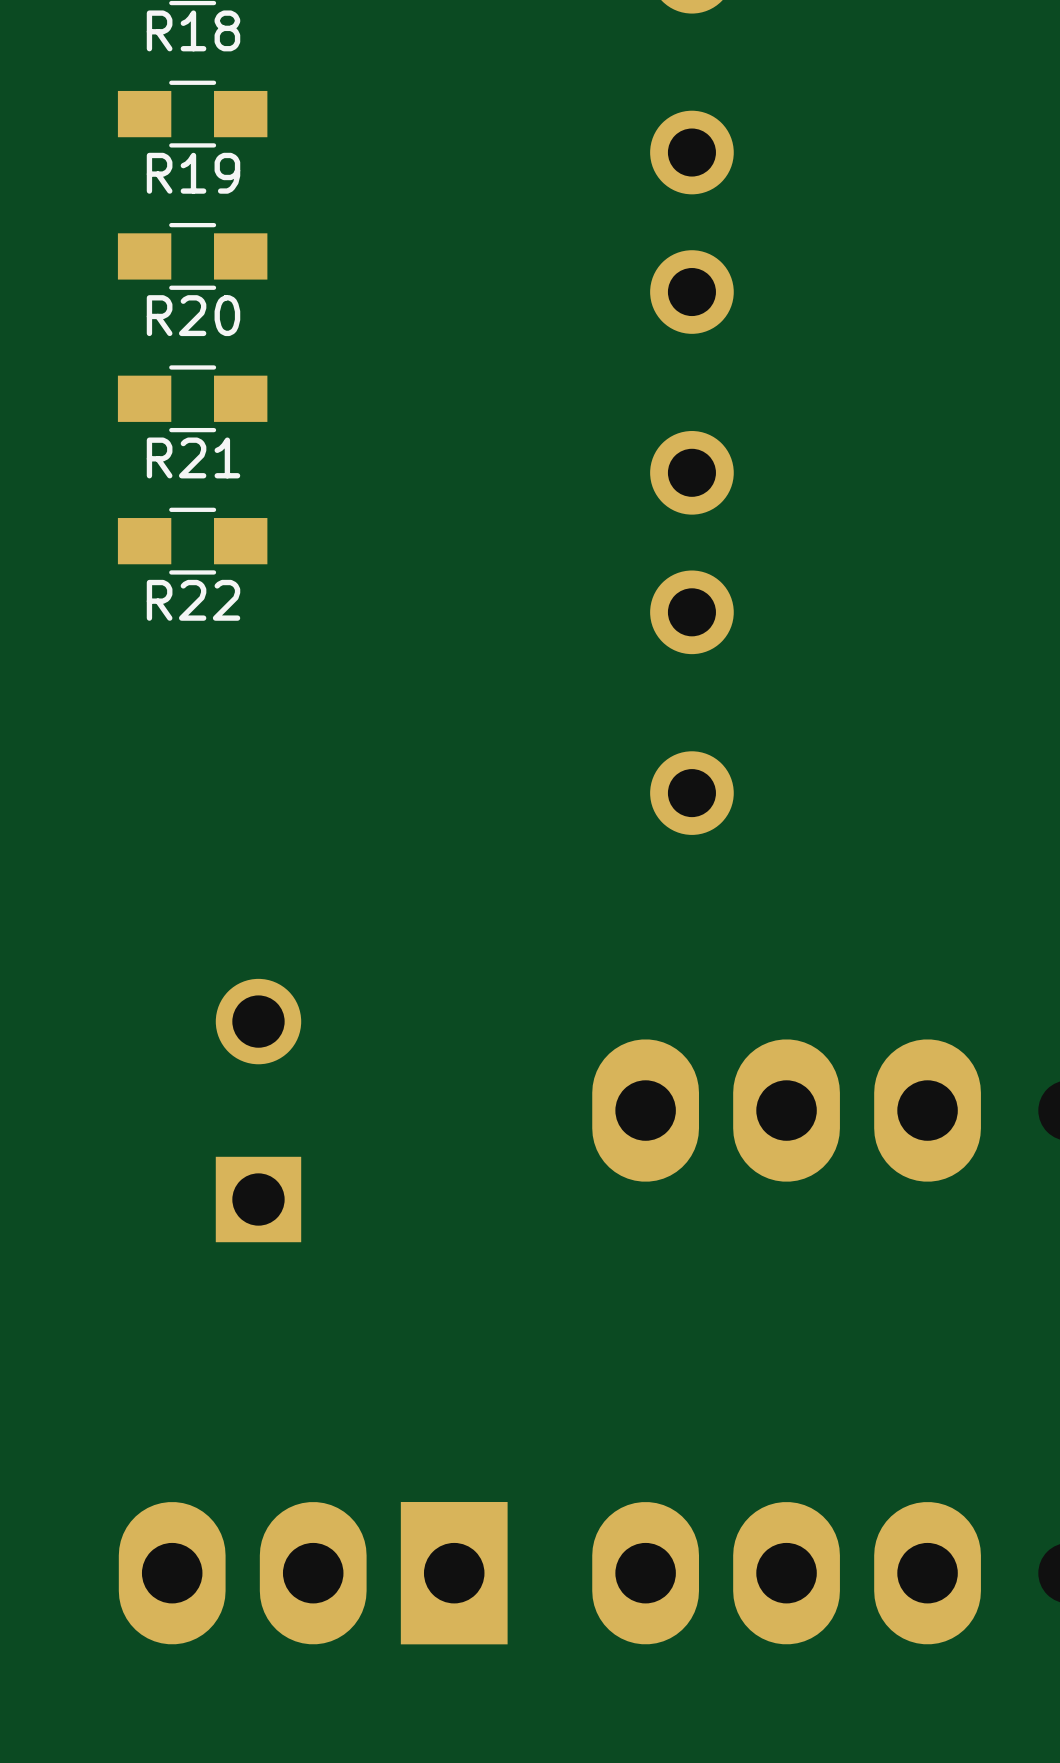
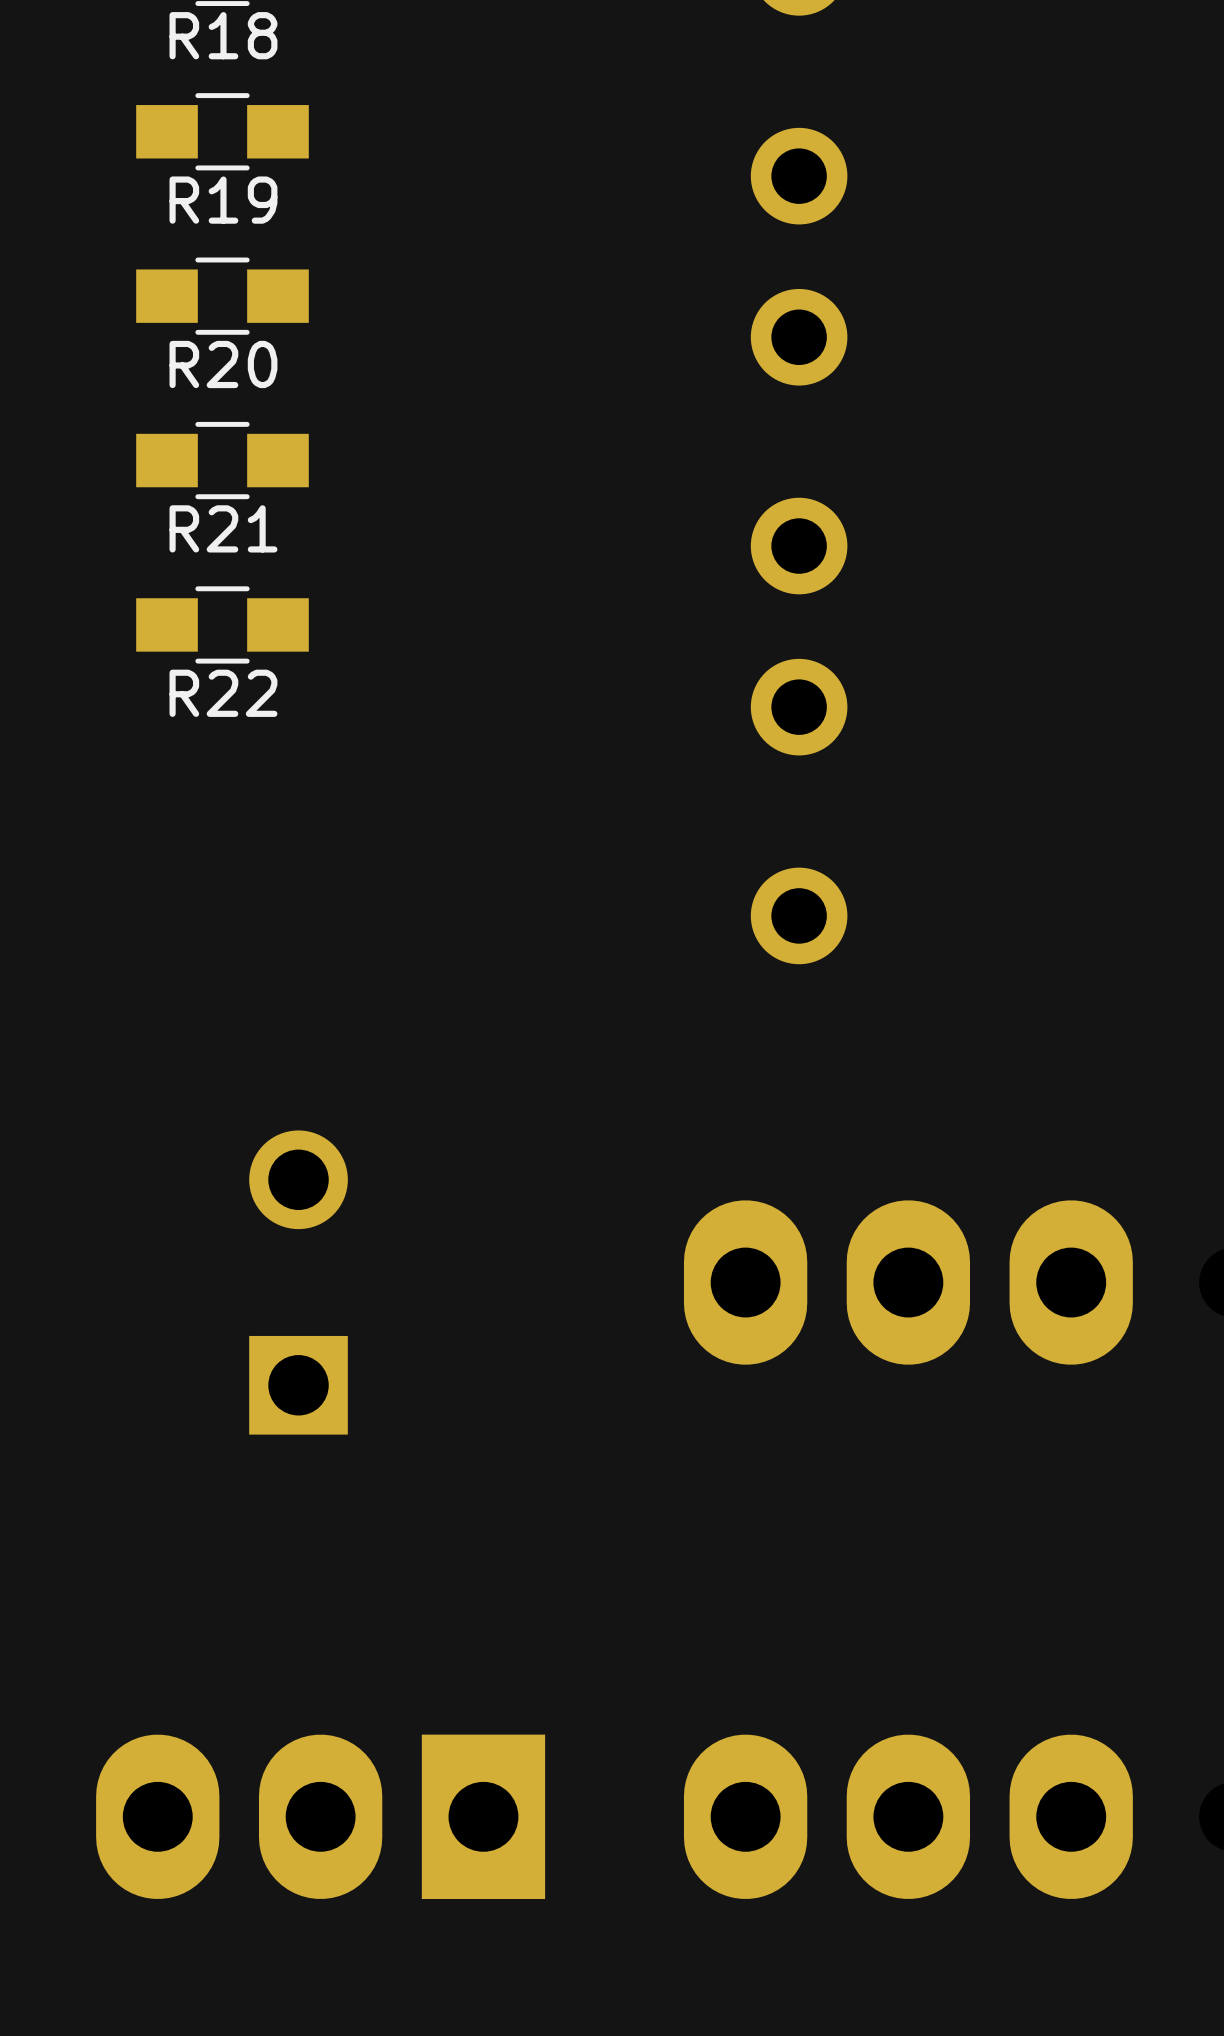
part position: (313, 1573) -> (320, 1816)

